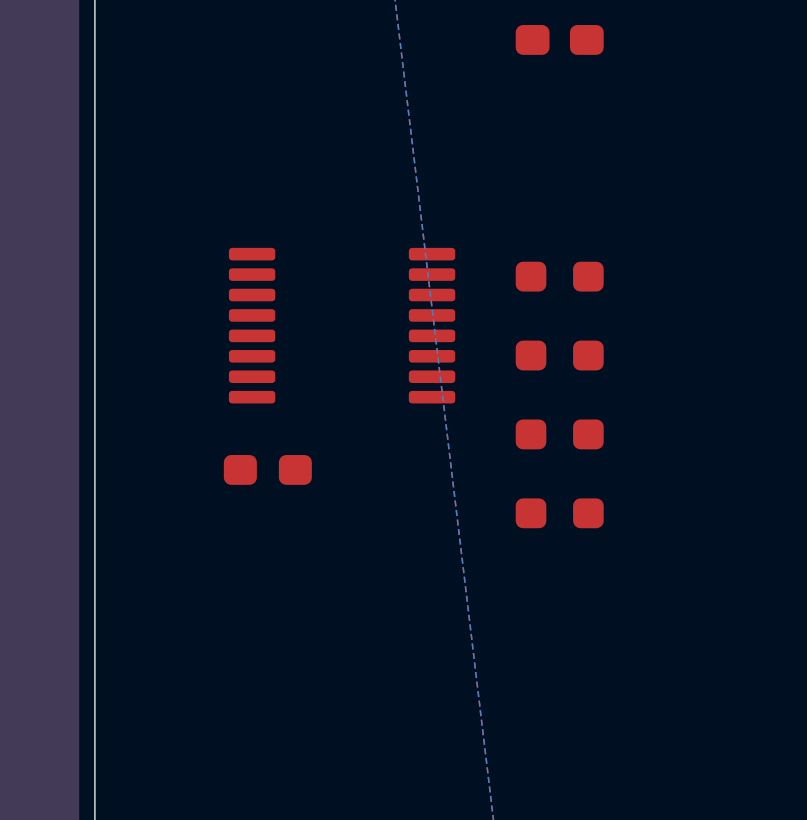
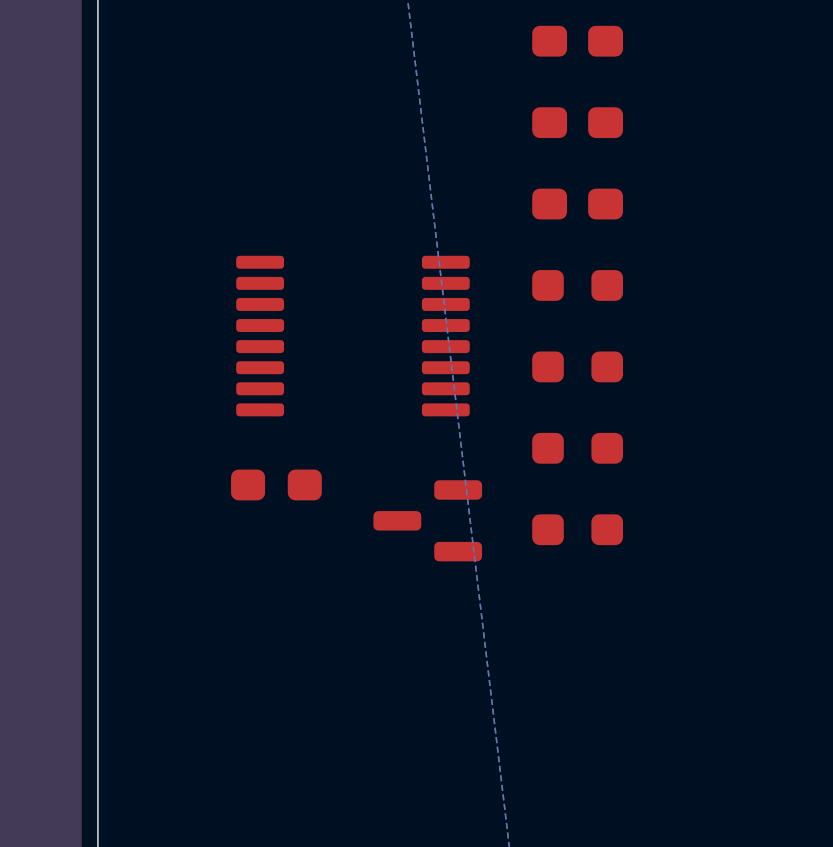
part: none -> (577, 122)
part: none -> (577, 204)
part: none -> (427, 520)

